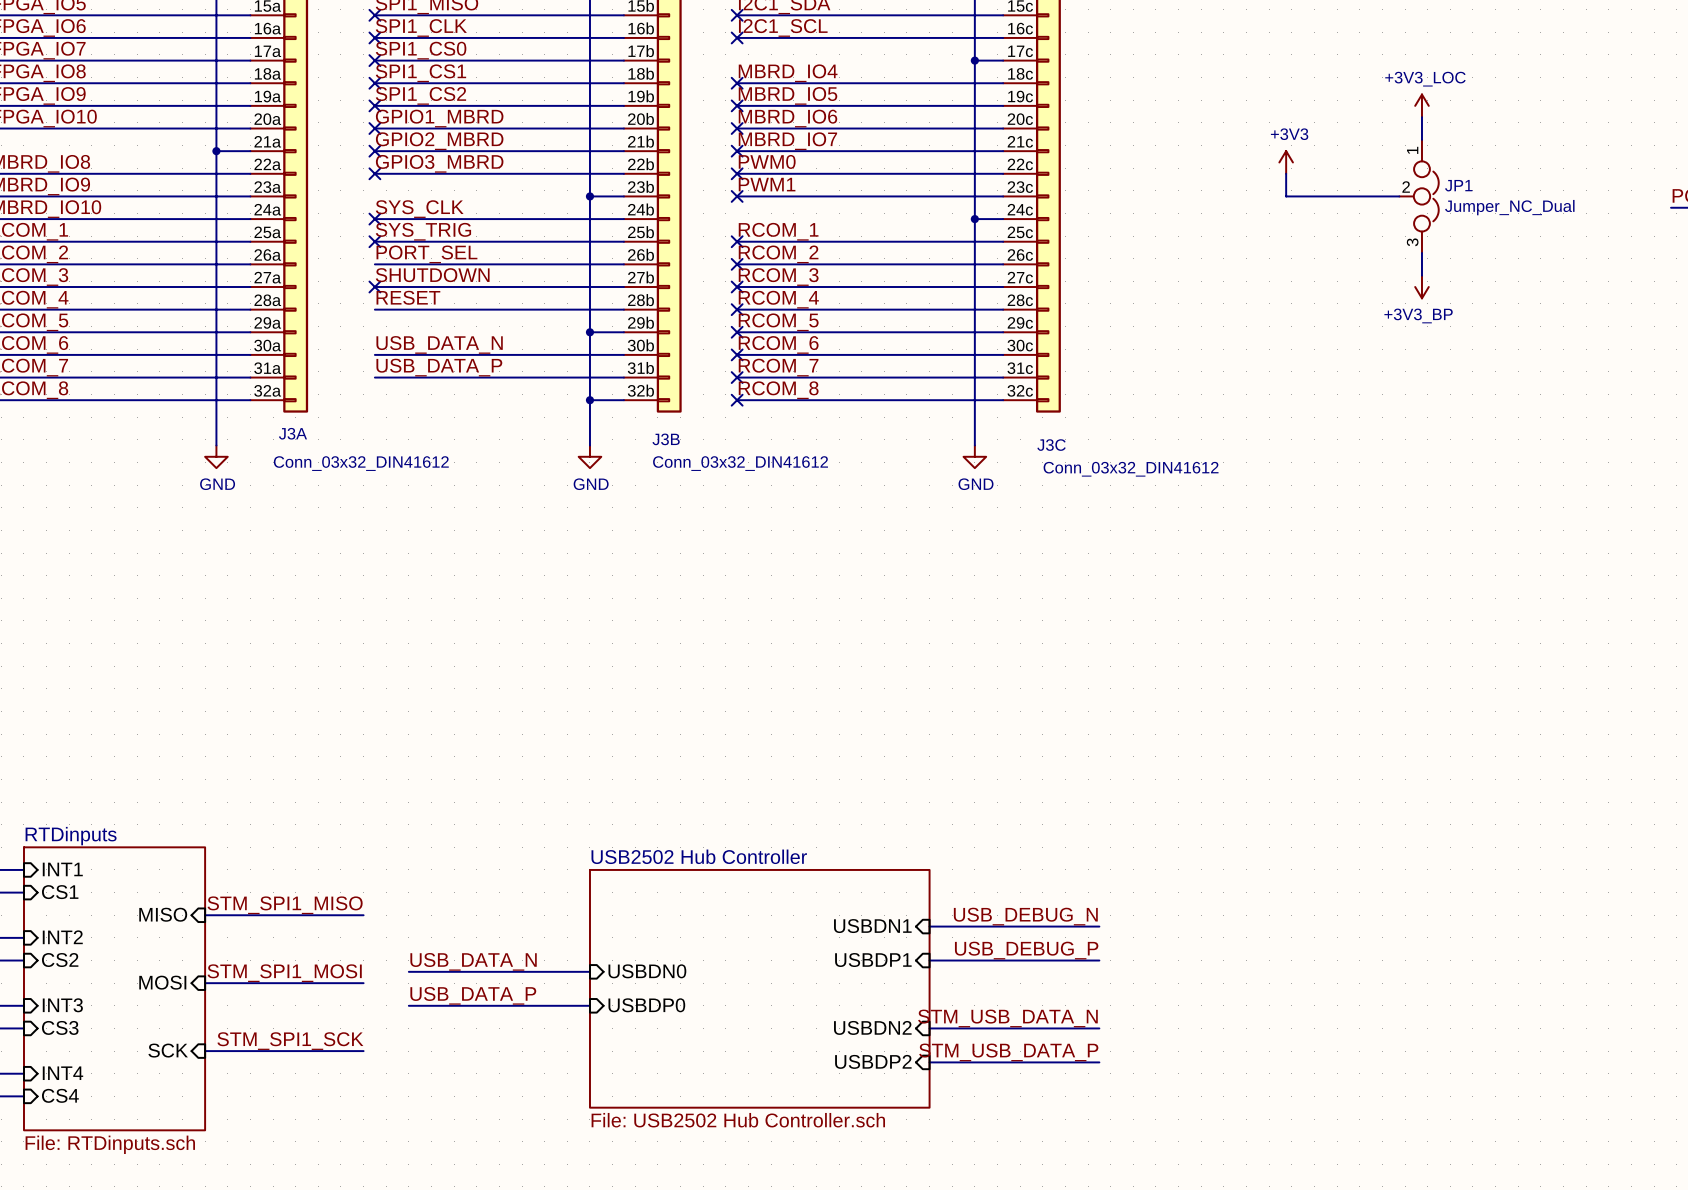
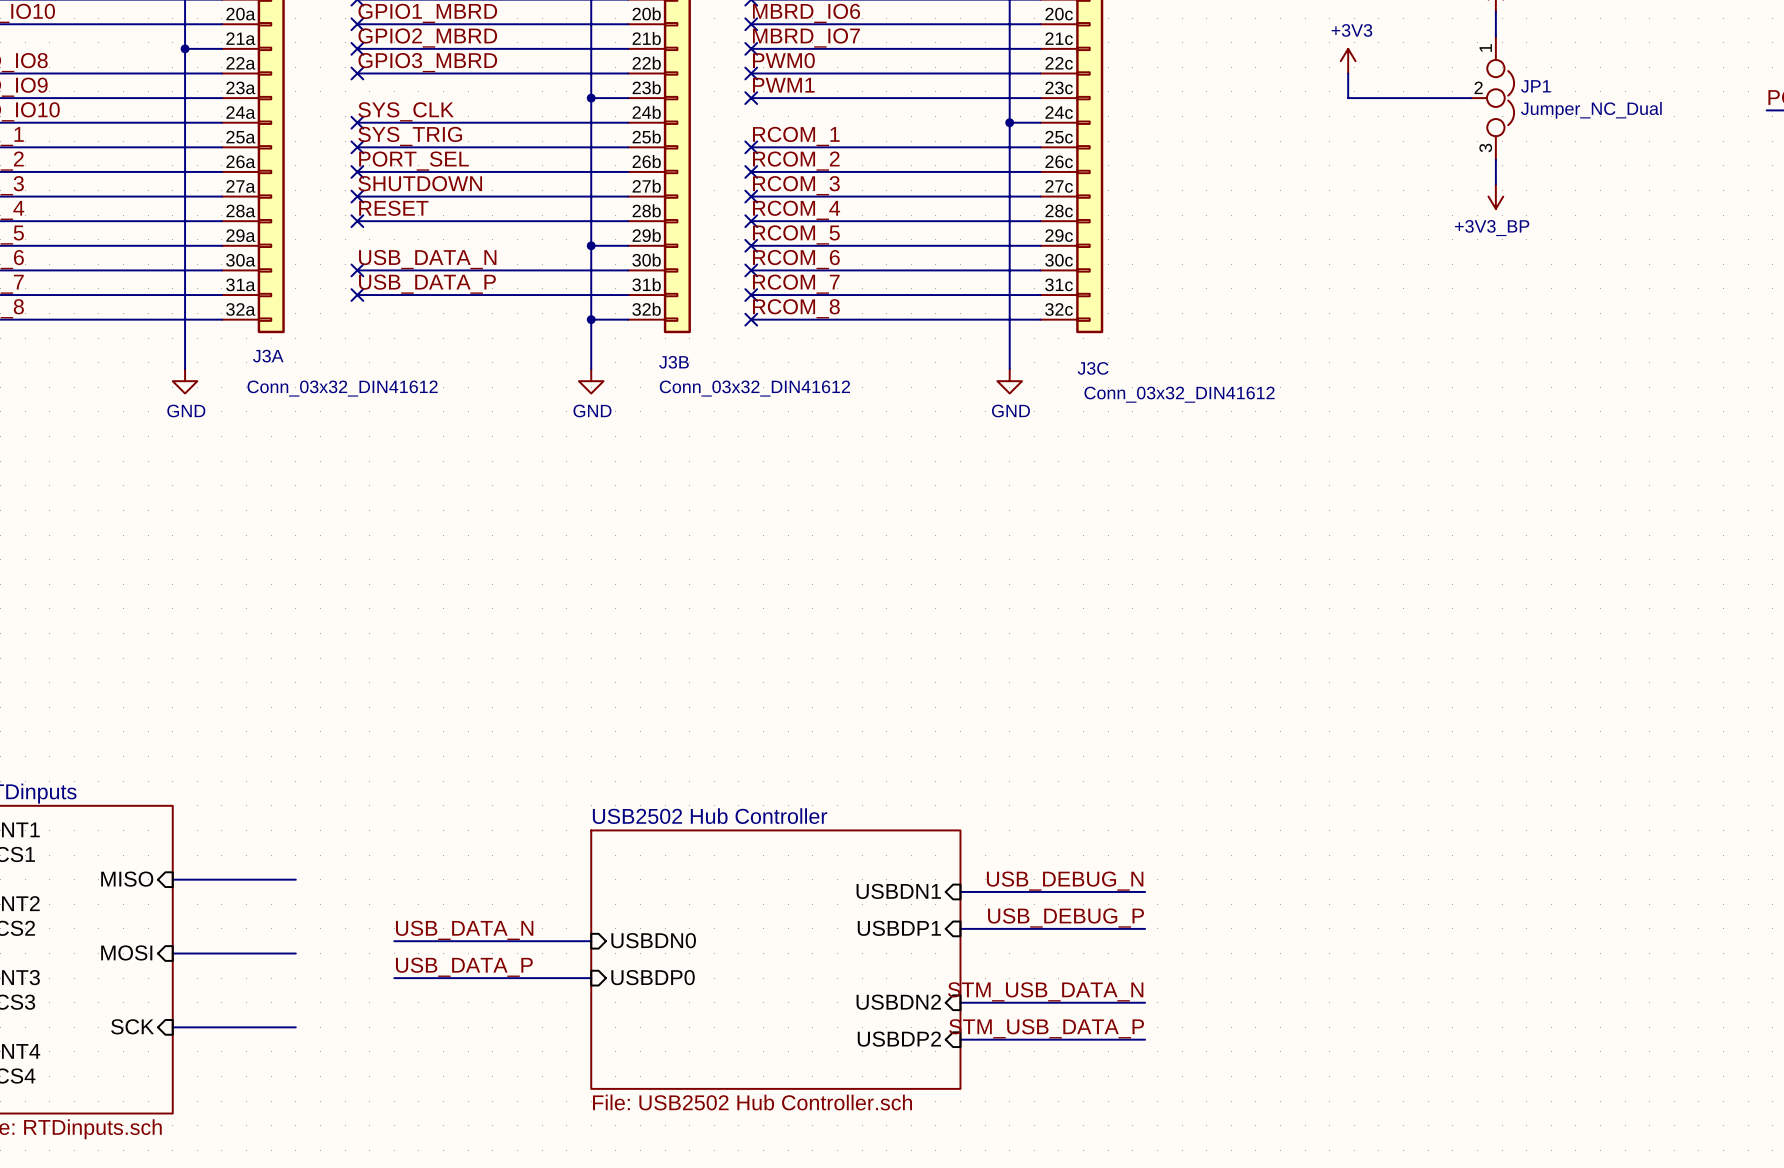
no-connect mark: none -> (357, 171)
no-connect mark: none -> (357, 221)
no-connect mark: none -> (357, 270)
no-connect mark: none -> (357, 295)
label: STM_SPI1_MISO (285, 905) -> none
wire: (318, 915) (363, 915) -> none
label: STM_SPI1_MOSI (284, 973) -> none
wire: (318, 983) (363, 983) -> none
label: STM_SPI1_SCK (290, 1041) -> none
wire: (318, 1051) (363, 1051) -> none

